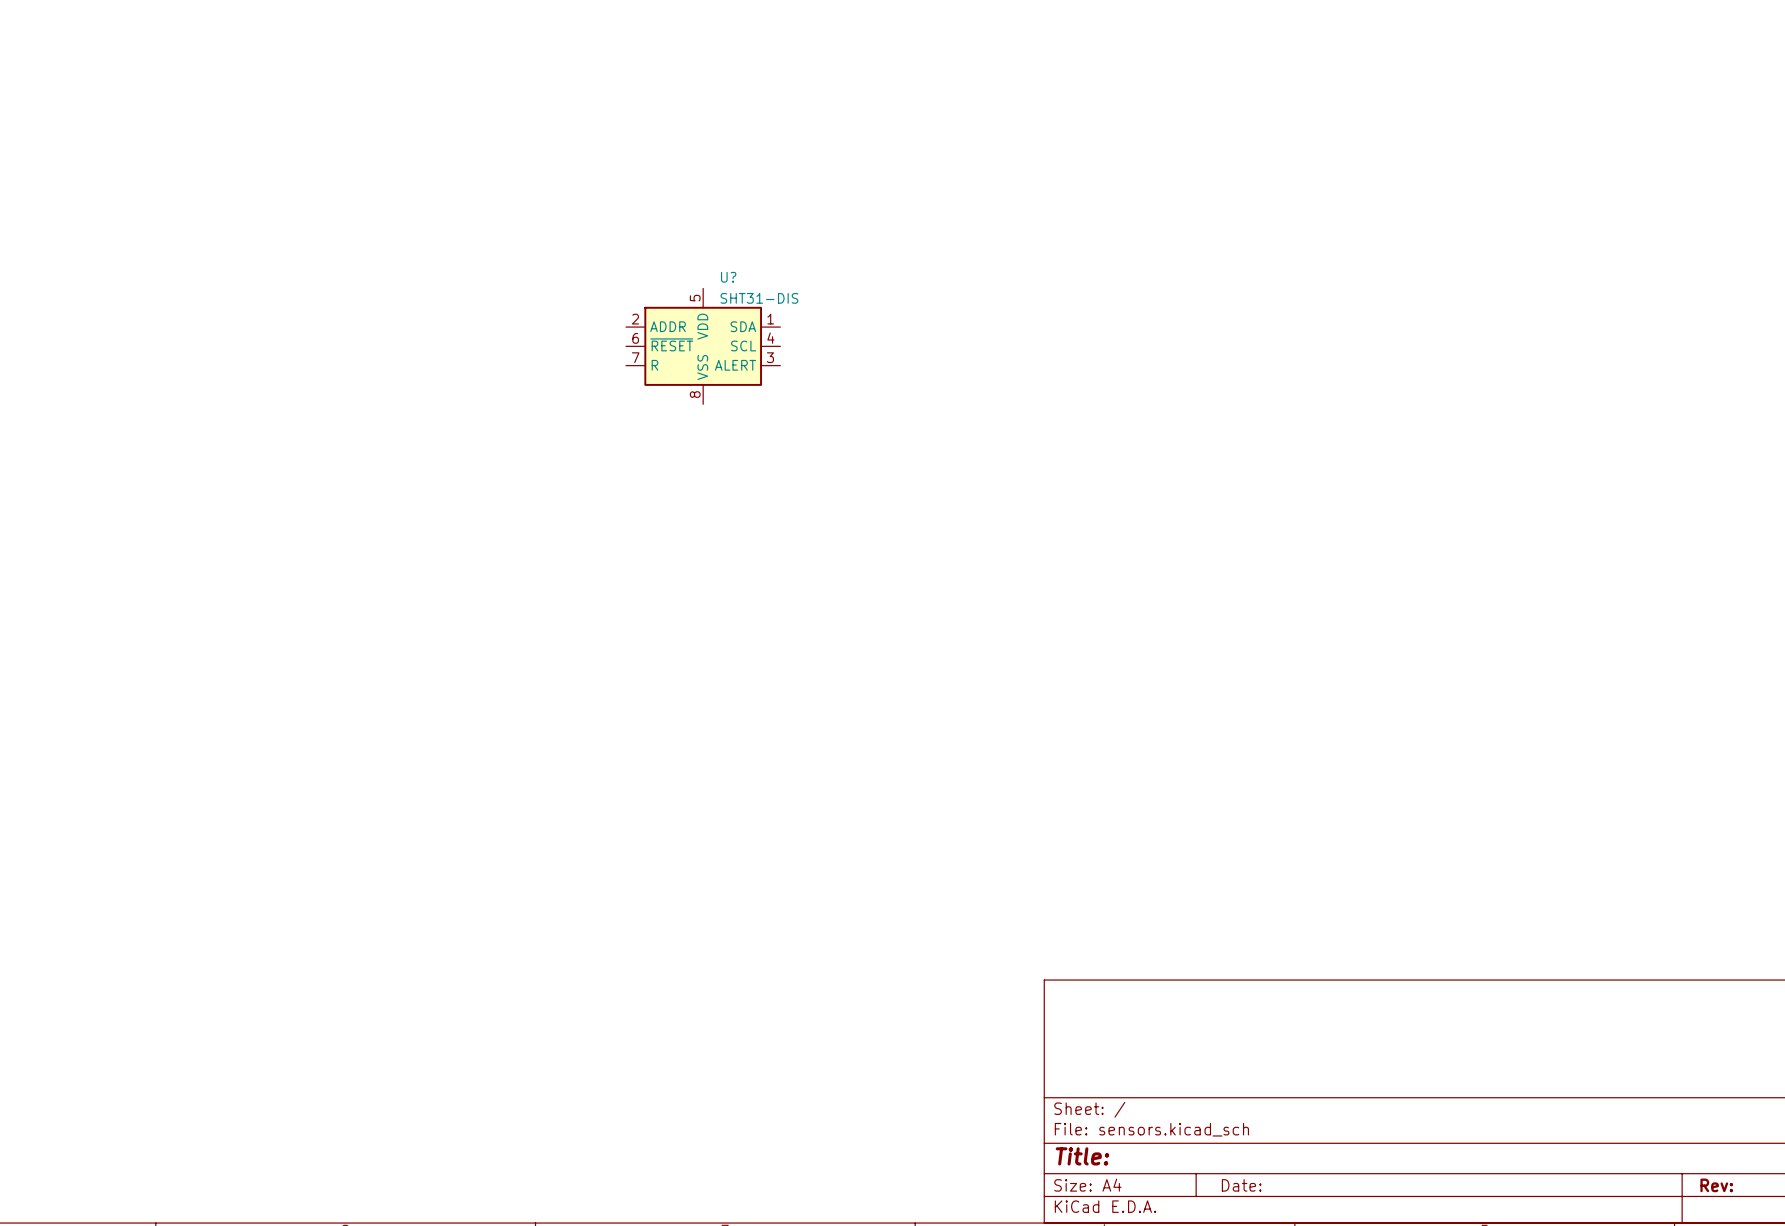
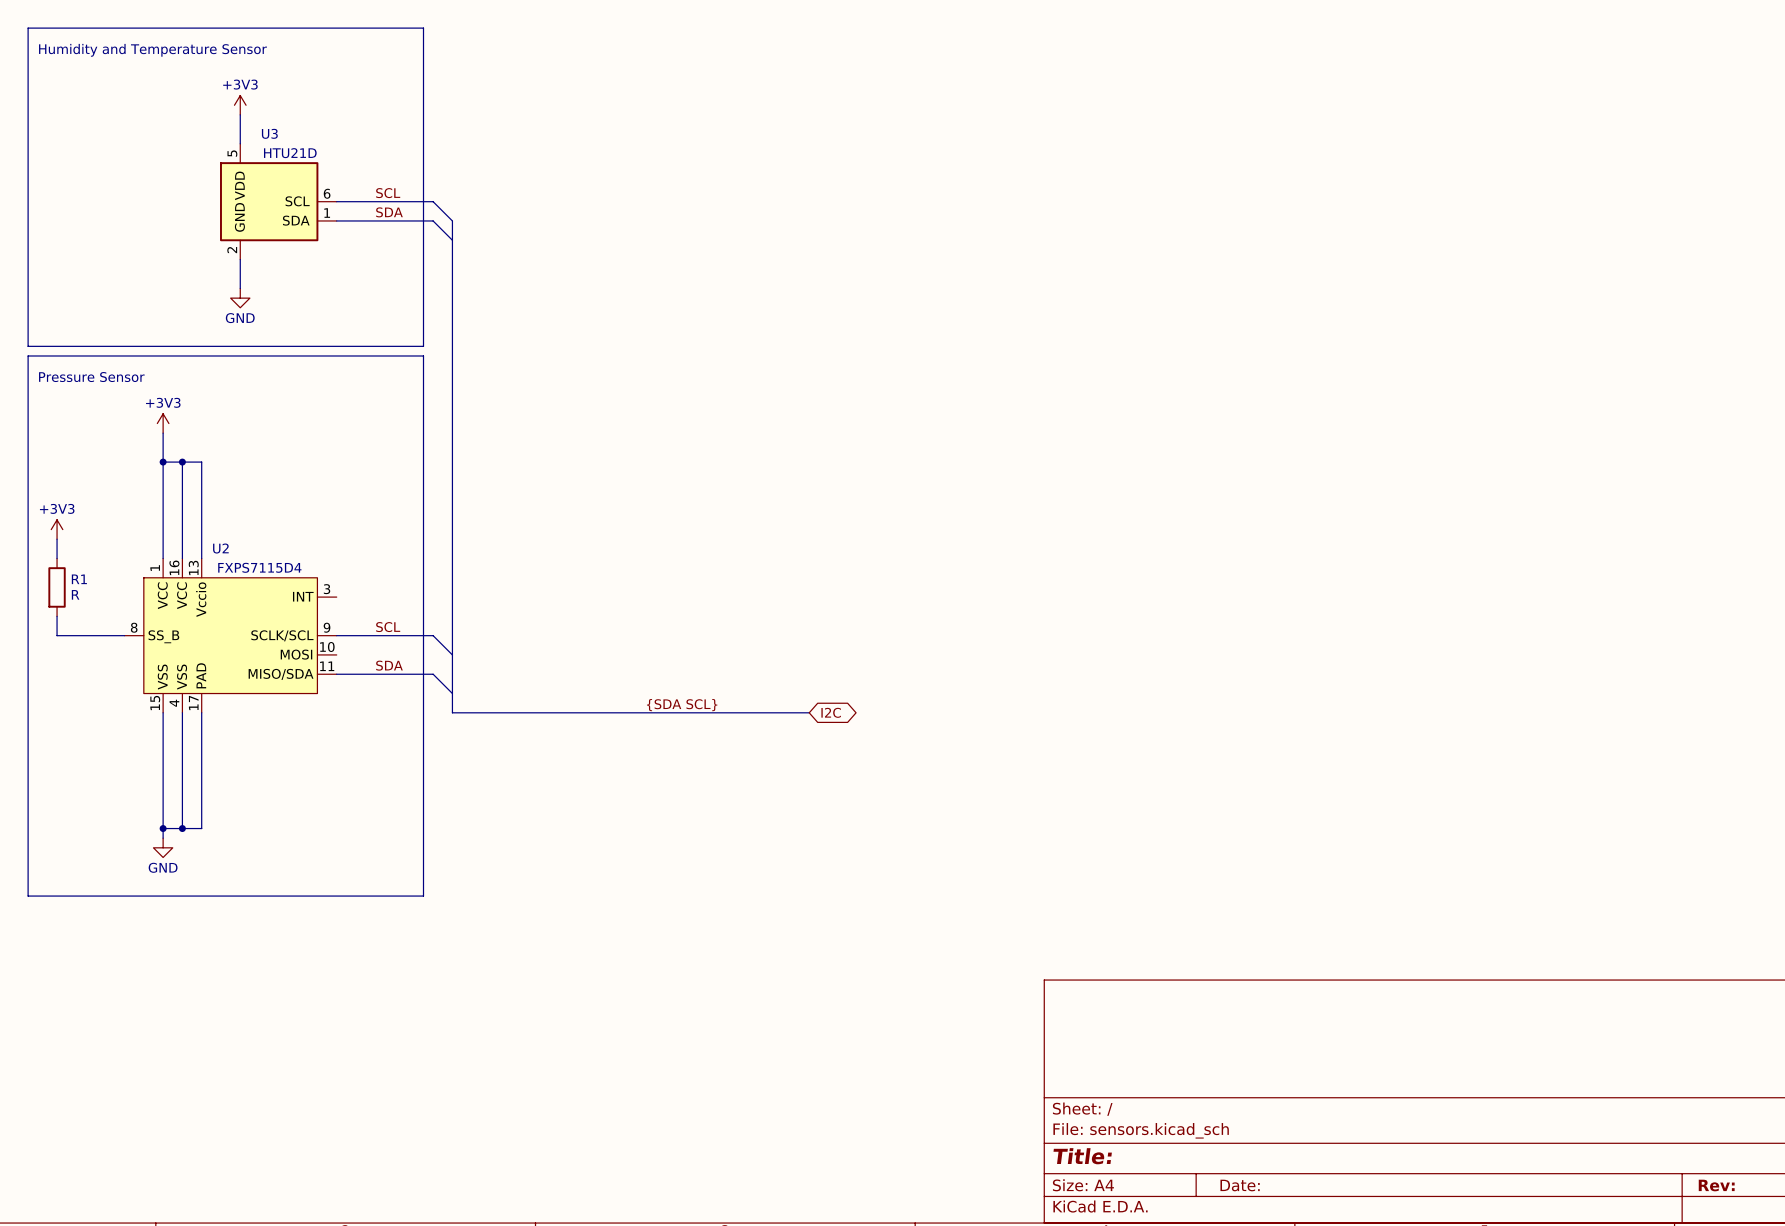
line: none -> (28, 28) (423, 28) (423, 346) (28, 346) (28, 28)
text: none -> Humidity and Temperature Sensor (152, 50)
power symbol: none -> +3V3 (240, 105)
wire: none -> (240, 114) (240, 143)
label: none -> SCL (388, 193)
U3: none -> HTU21D (278, 201)
wire: none -> (336, 201) (433, 201) (452, 220)
label: none -> SDA (389, 212)
wire: none -> (336, 220) (433, 220) (452, 240)
bus: none -> (452, 220) (452, 712) (809, 712)
wire: none -> (240, 259) (240, 288)
power symbol: none -> GND (240, 298)
U?: SHT31-DIS (703, 346) -> none
line: none -> (28, 355) (28, 896) (423, 896) (423, 355) (28, 355)
text: none -> Pressure Sensor (91, 377)
power symbol: none -> +3V3 (163, 423)
wire: none -> (163, 433) (163, 558)
wire: none -> (163, 462) (201, 462) (201, 558)
junction: none -> (163, 462)
wire: none -> (182, 462) (182, 558)
junction: none -> (182, 462)
power symbol: none -> +3V3 (57, 529)
wire: none -> (57, 539) (57, 558)
R1: none -> R (57, 587)
wire: none -> (57, 616) (57, 635) (124, 635)
label: none -> SCL (388, 627)
U2: none -> FXPS7115D4 (230, 635)
wire: none -> (336, 635) (433, 635) (452, 654)
label: none -> SDA (389, 665)
wire: none -> (336, 674) (433, 674) (452, 693)
label: none -> {SDA SCL} (682, 705)
wire: none -> (163, 712) (163, 838)
wire: none -> (182, 712) (182, 828)
wire: none -> (201, 712) (201, 828) (163, 828)
global label: none -> I2C (831, 712)
junction: none -> (163, 828)
junction: none -> (182, 828)
power symbol: none -> GND (163, 847)

